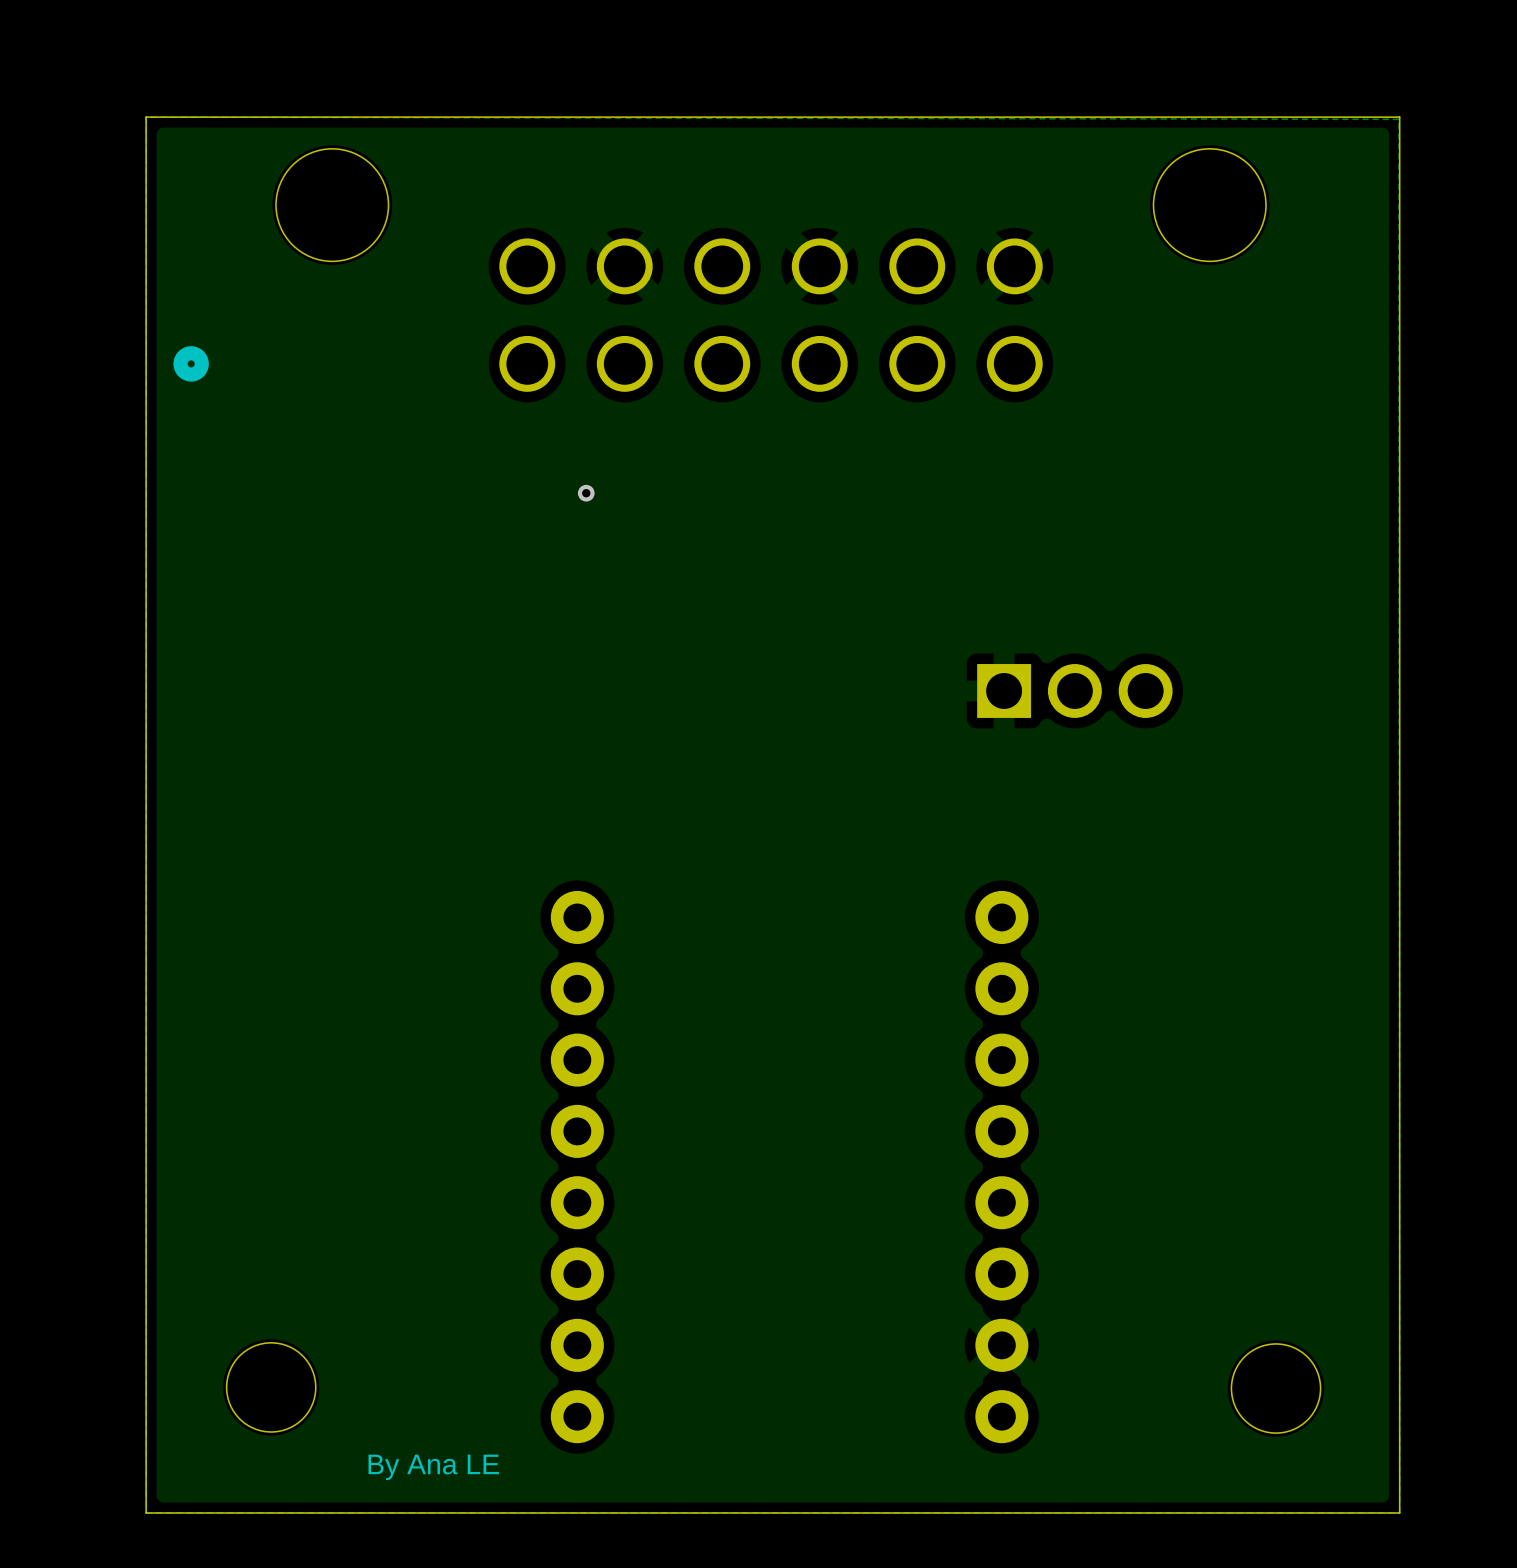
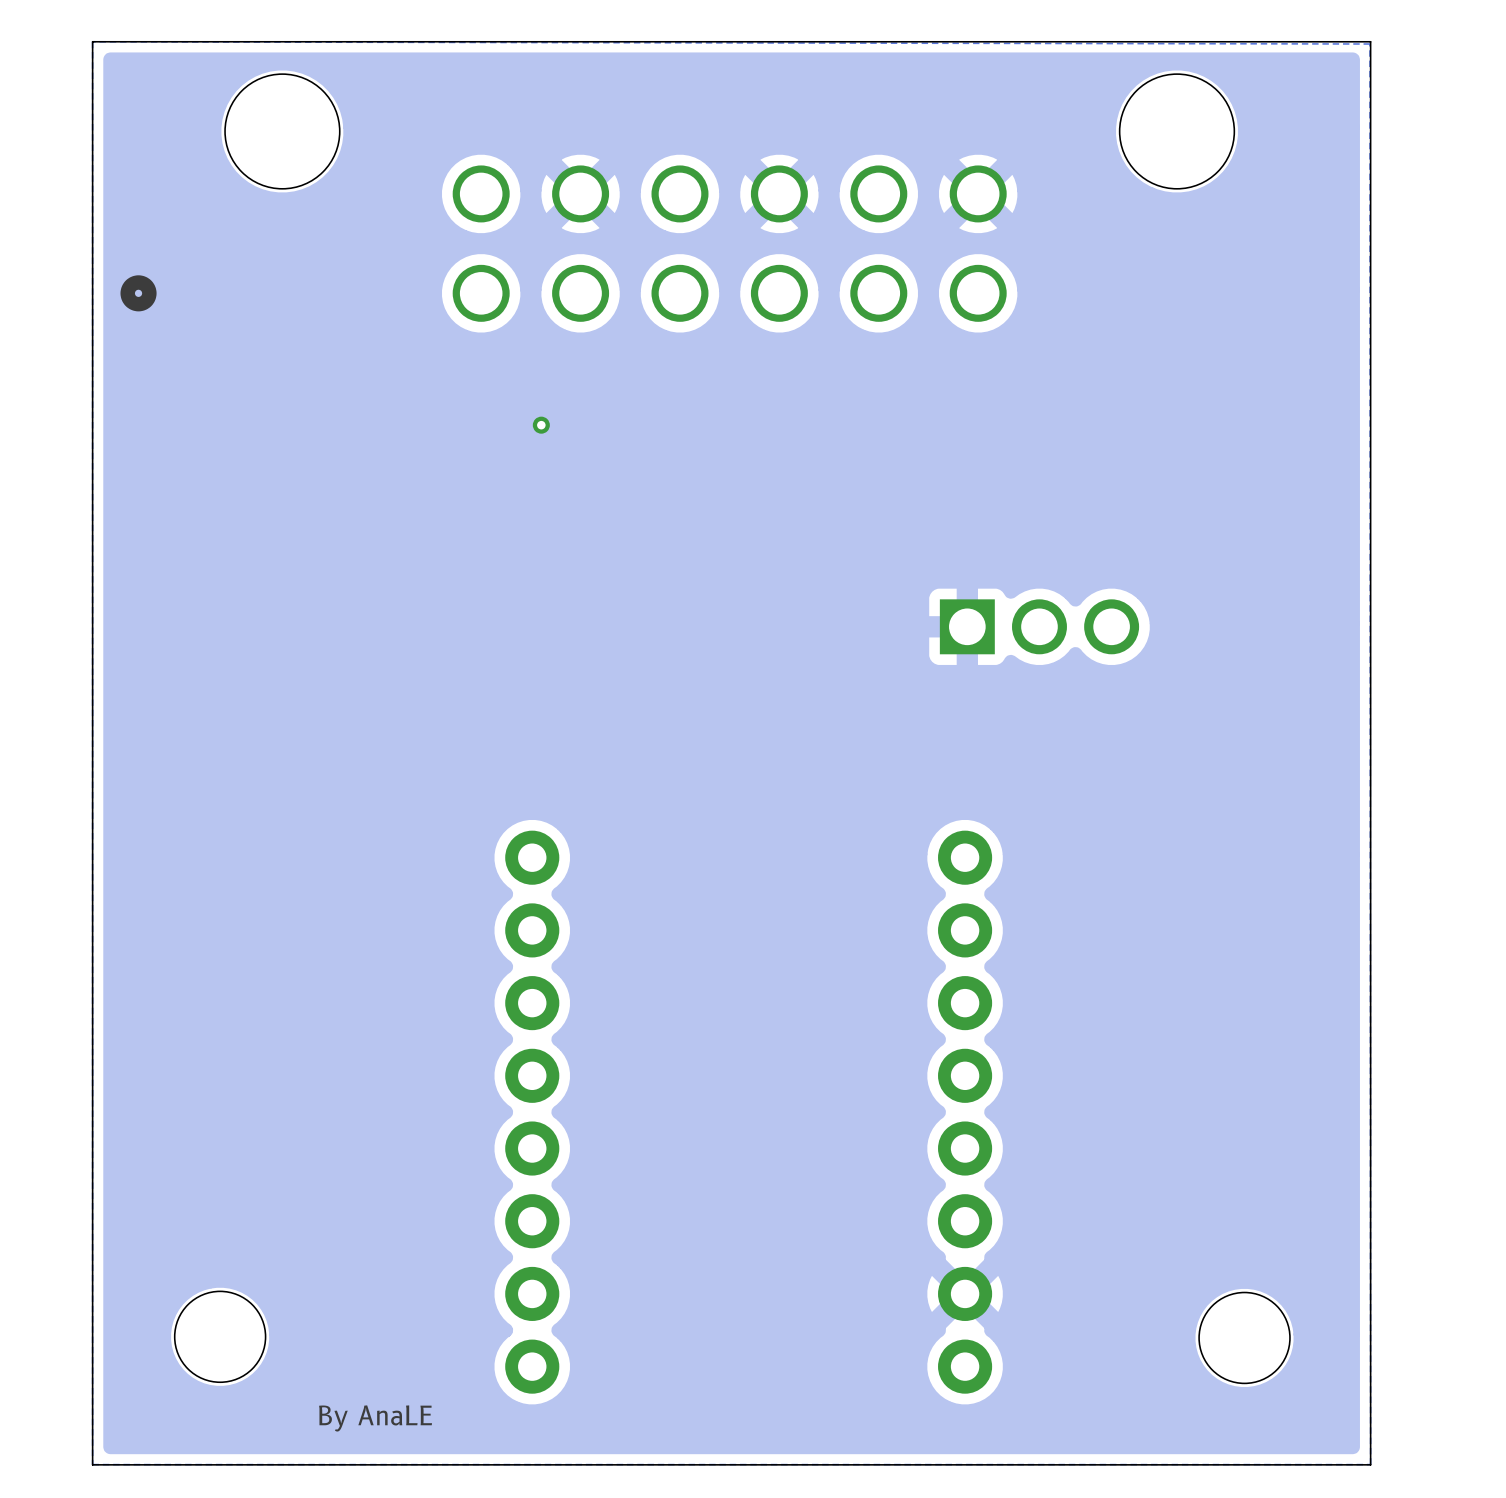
text: By Ana LE (433, 1467) -> By AnaLE (375, 1418)

